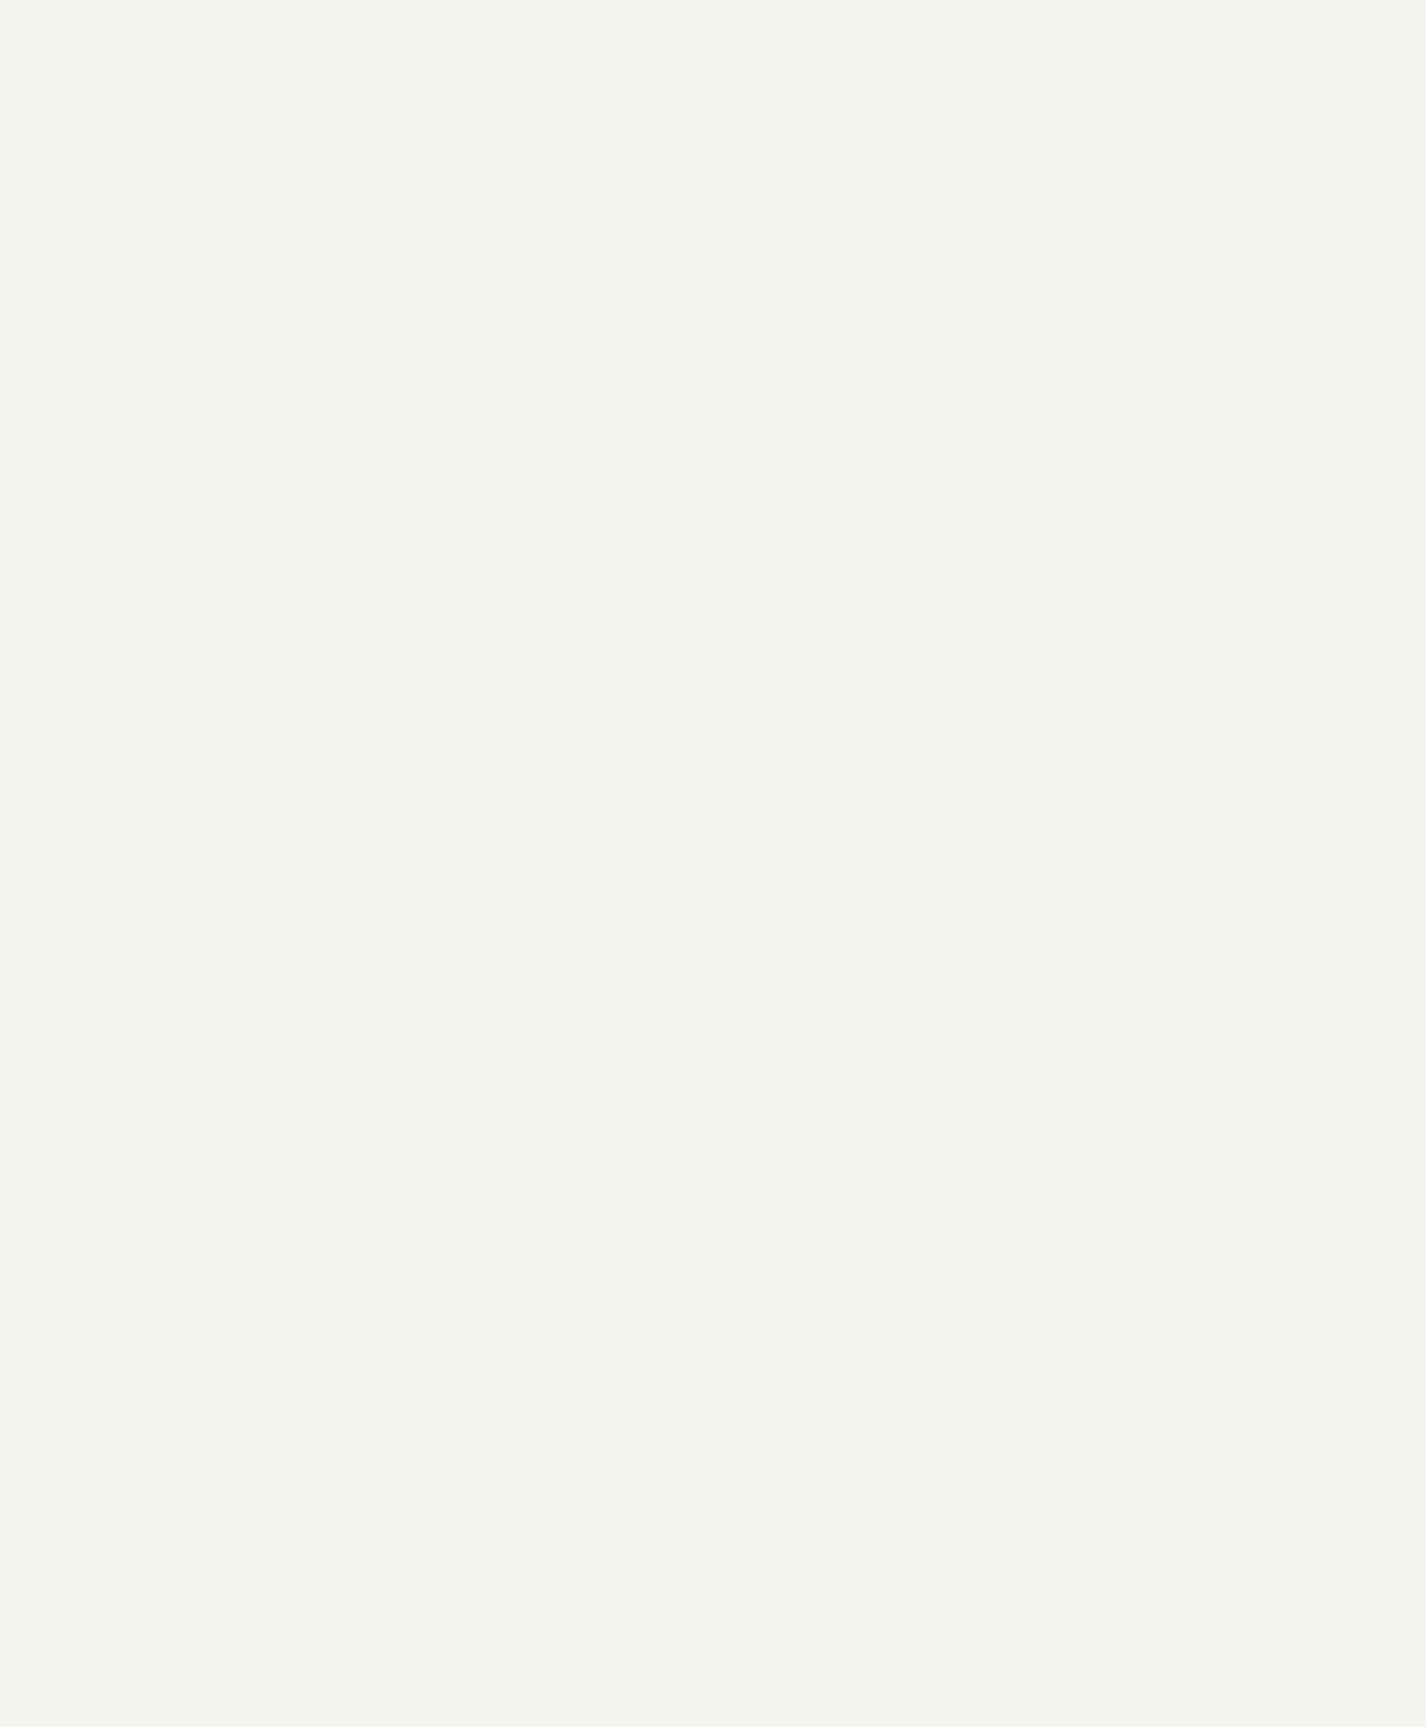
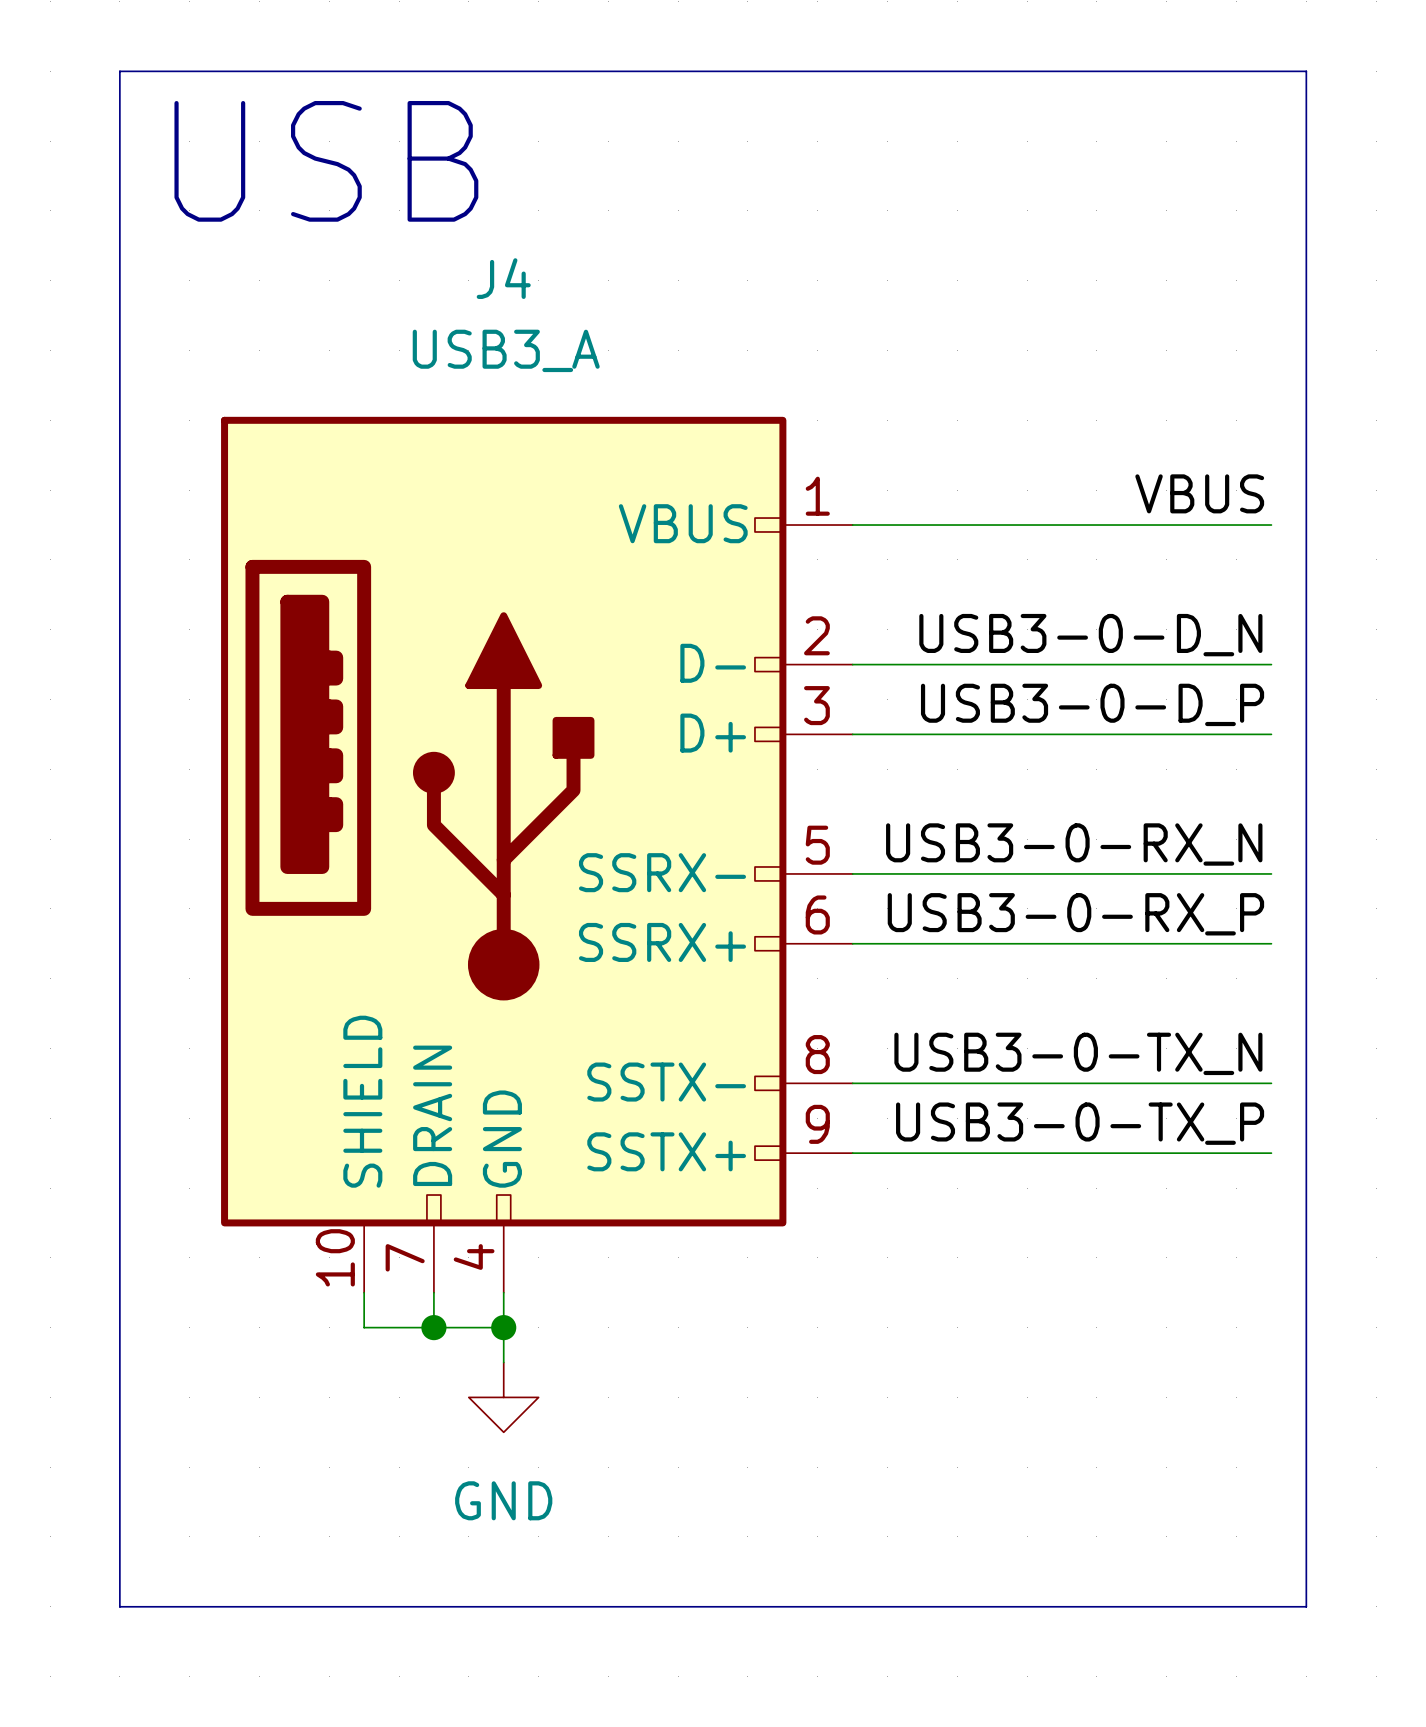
line: none -> (119, 71) (1306, 71) (1306, 1606) (119, 1606) (119, 71)
text: none -> USB (326, 161)
label: none -> VBUS (1199, 493)
wire: none -> (852, 525) (1271, 525)
label: none -> USB3-0-D_N (1090, 635)
wire: none -> (852, 664) (1271, 664)
label: none -> USB3-0-D_P (1092, 704)
wire: none -> (852, 734) (1271, 734)
label: none -> USB3-0-RX_N (1074, 844)
J4: none -> USB3_A (536, 854)
wire: none -> (852, 873) (1271, 873)
label: none -> USB3-0-RX_P (1075, 914)
wire: none -> (852, 943) (1271, 943)
label: none -> USB3-0-TX_N (1078, 1053)
wire: none -> (852, 1083) (1271, 1083)
label: none -> USB3-0-TX_P (1080, 1123)
wire: none -> (852, 1153) (1271, 1153)
wire: none -> (364, 1292) (364, 1327) (503, 1327)
wire: none -> (433, 1292) (433, 1327)
wire: none -> (503, 1292) (503, 1362)
junction: none -> (433, 1327)
junction: none -> (503, 1327)
power symbol: none -> GND (503, 1397)

